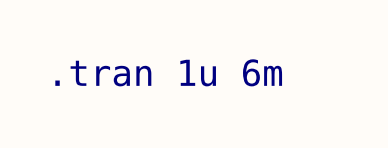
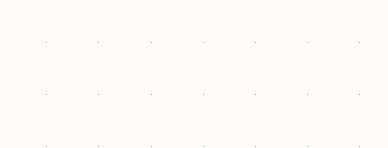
text: .tran 1u 6m (168, 72) -> none

